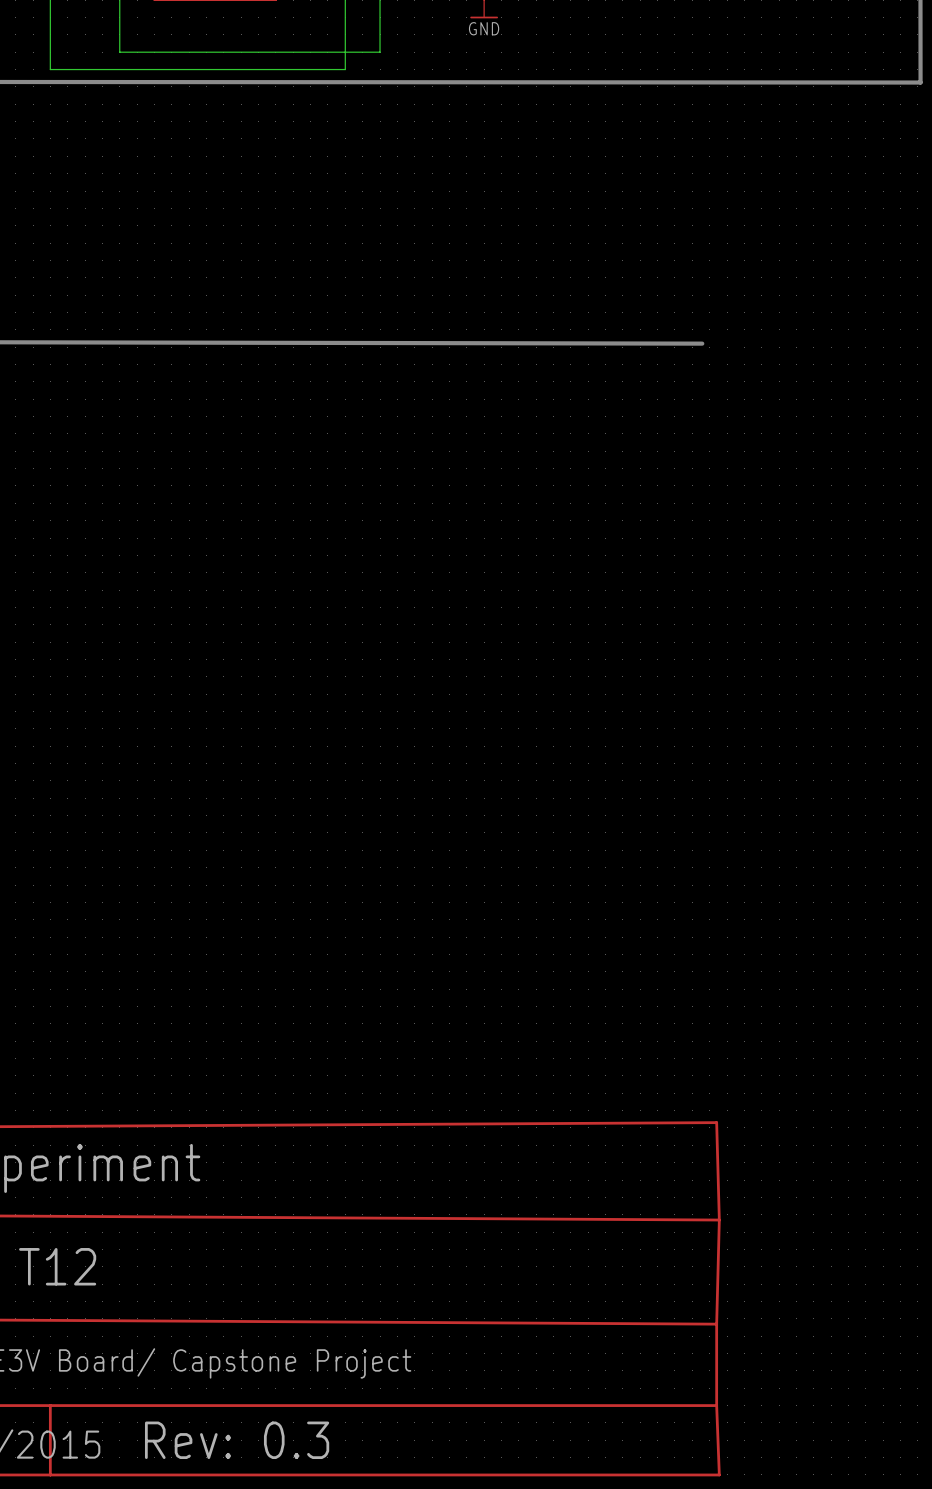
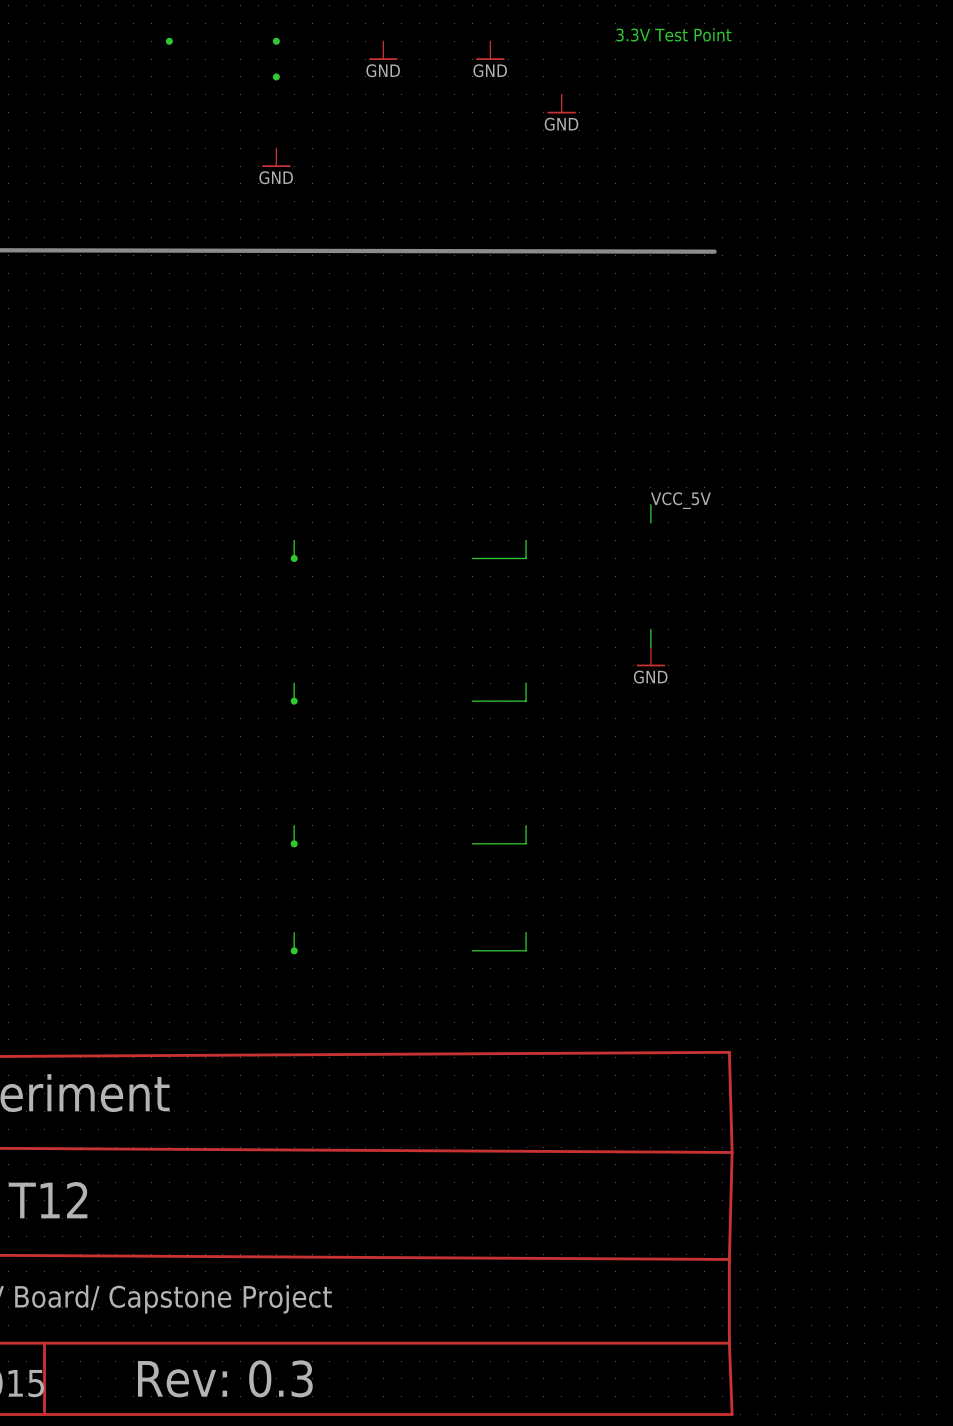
text: none -> 3.3V Test Point (673, 34)
junction: none -> (169, 41)
junction: none -> (276, 41)
power symbol: none -> GND (383, 50)
power symbol: none -> GND (490, 50)
junction: none -> (276, 76)
power symbol: none -> GND (561, 104)
power symbol: none -> GND (276, 157)
label: none -> VCC_5V (680, 500)
wire: none -> (650, 504) (650, 522)
wire: none -> (294, 540) (294, 558)
wire: none -> (526, 540) (526, 558) (472, 558)
junction: none -> (294, 558)
wire: none -> (650, 629) (650, 647)
power symbol: none -> GND (650, 657)
wire: none -> (294, 683) (294, 701)
wire: none -> (526, 683) (526, 701) (472, 701)
junction: none -> (294, 701)
wire: none -> (294, 825) (294, 843)
wire: none -> (526, 825) (526, 843) (472, 843)
junction: none -> (294, 843)
wire: none -> (294, 932) (294, 950)
wire: none -> (526, 932) (526, 950) (472, 950)
junction: none -> (294, 950)

